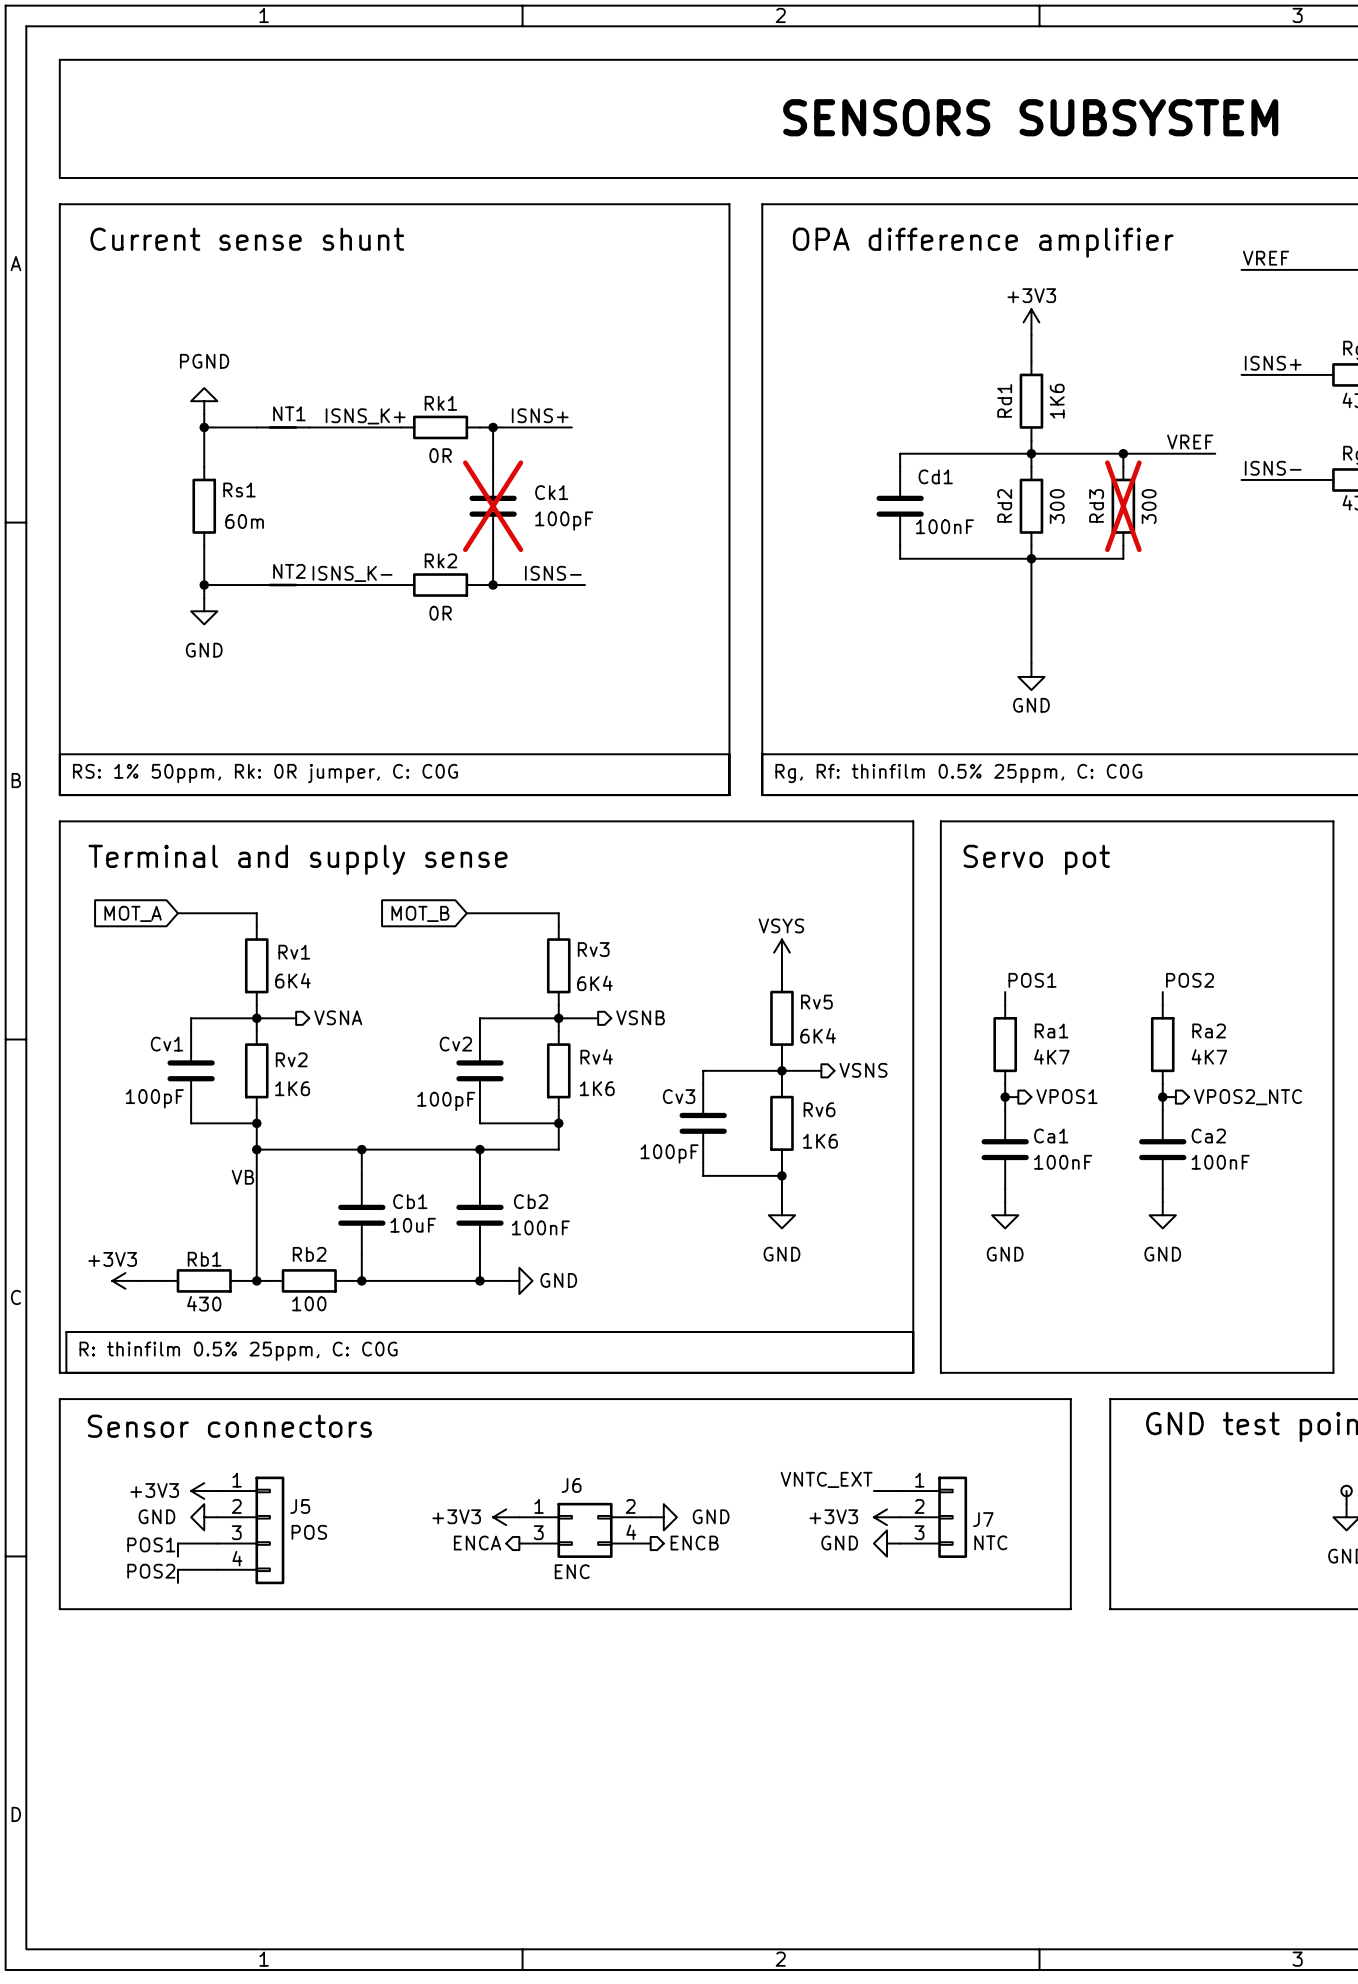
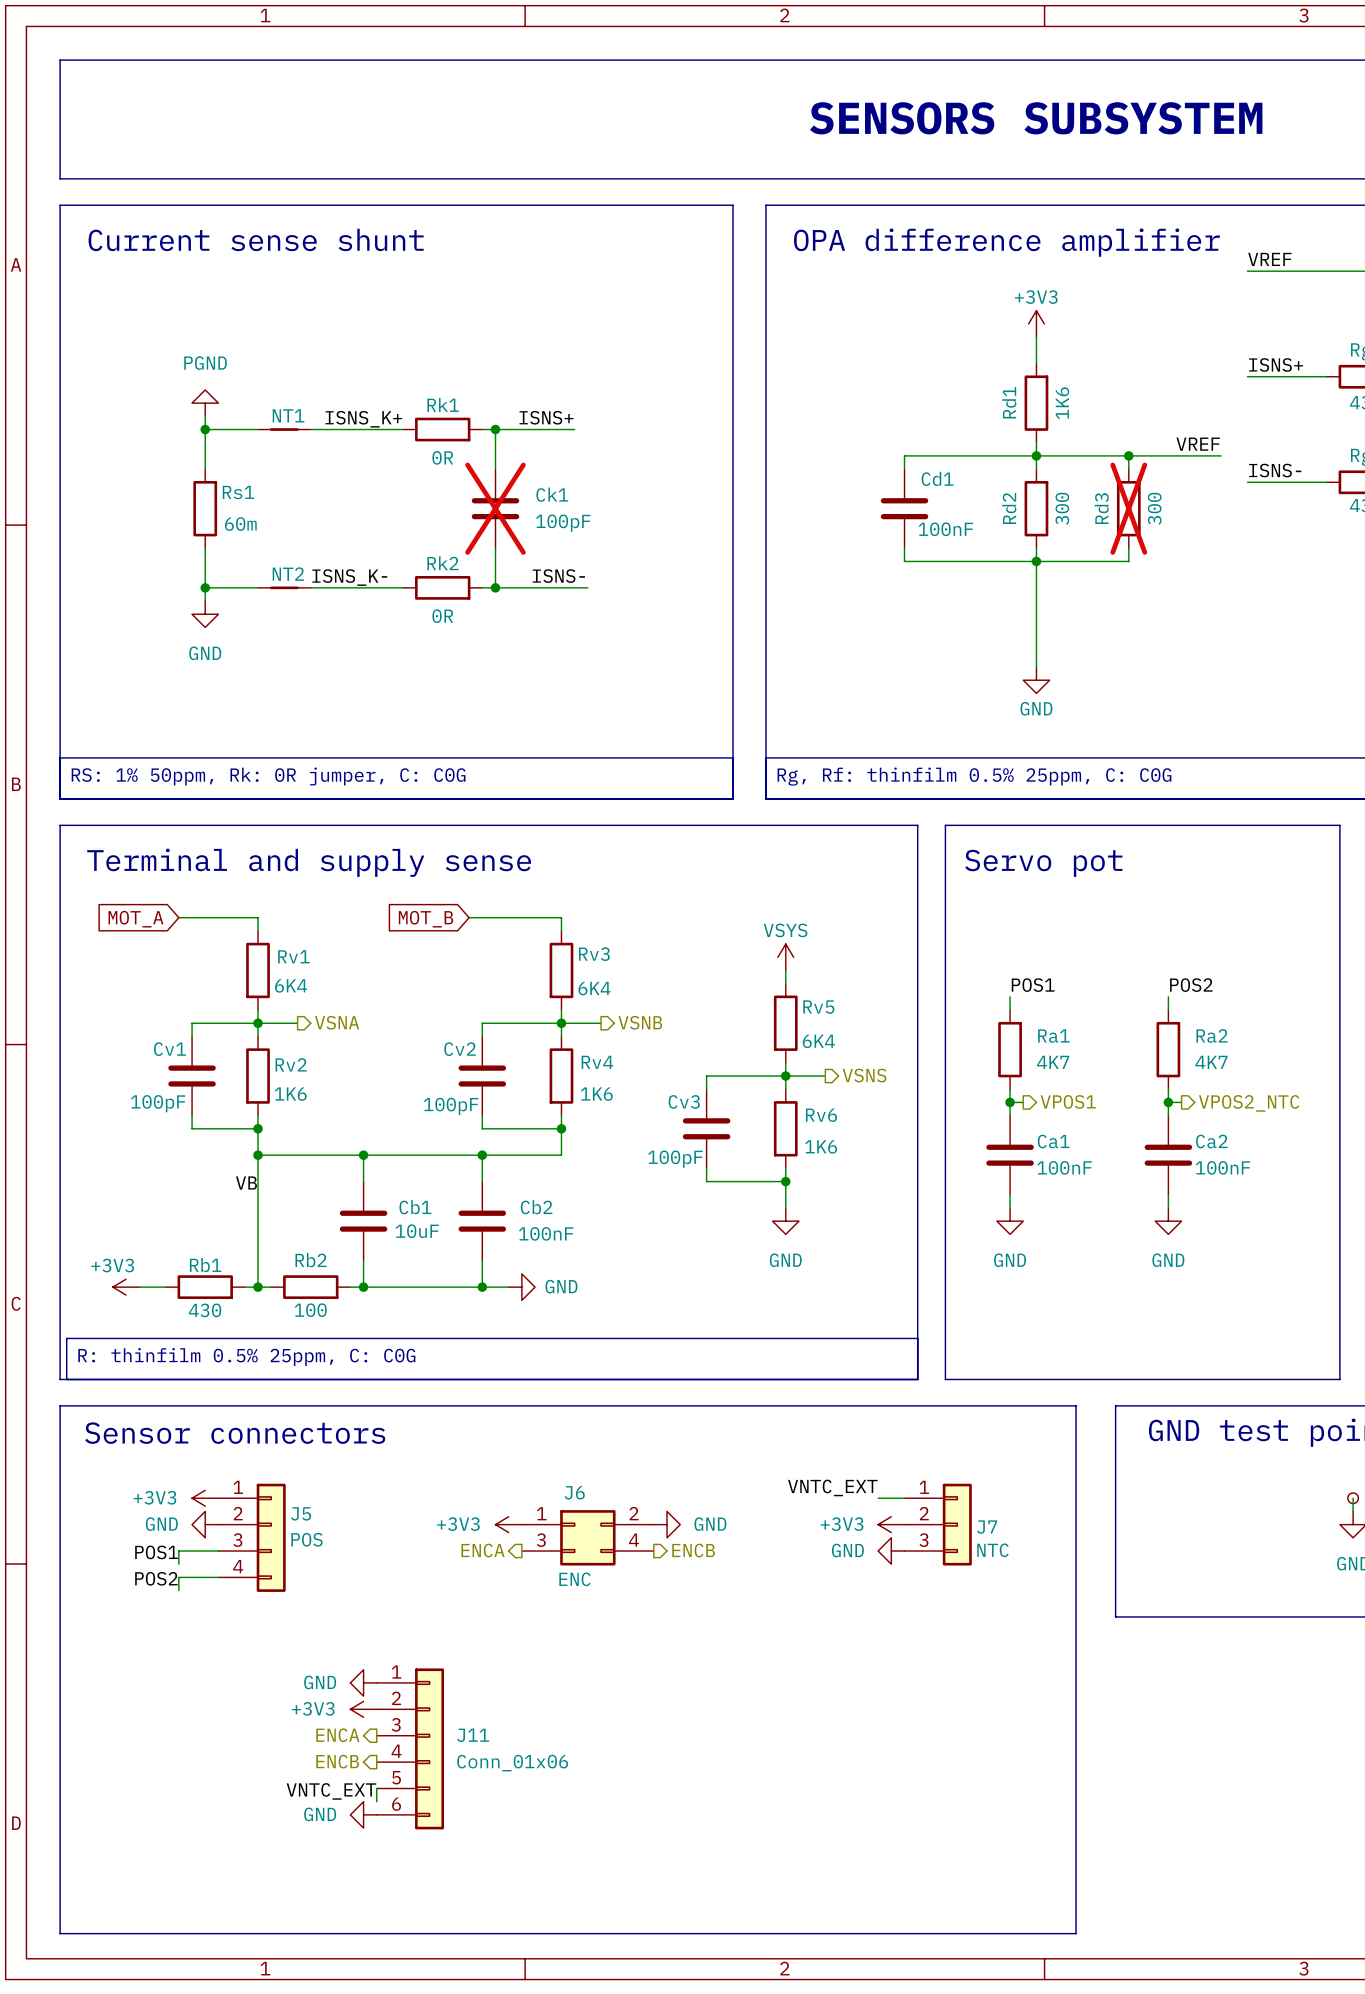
line: (59, 1609) (1070, 1609) -> (60, 1616) (60, 1933) (1076, 1933) (1076, 1616)
power symbol: none -> GND (363, 1682)
power symbol: none -> +3V3 (363, 1709)
hierarchical label: none -> ENCA (337, 1735)
J11: none -> Conn_01x06 (410, 1748)
hierarchical label: none -> ENCB (337, 1761)
wire: none -> (376, 1788) (376, 1801)
label: none -> VNTC_EXT (331, 1791)
power symbol: none -> GND (363, 1814)

